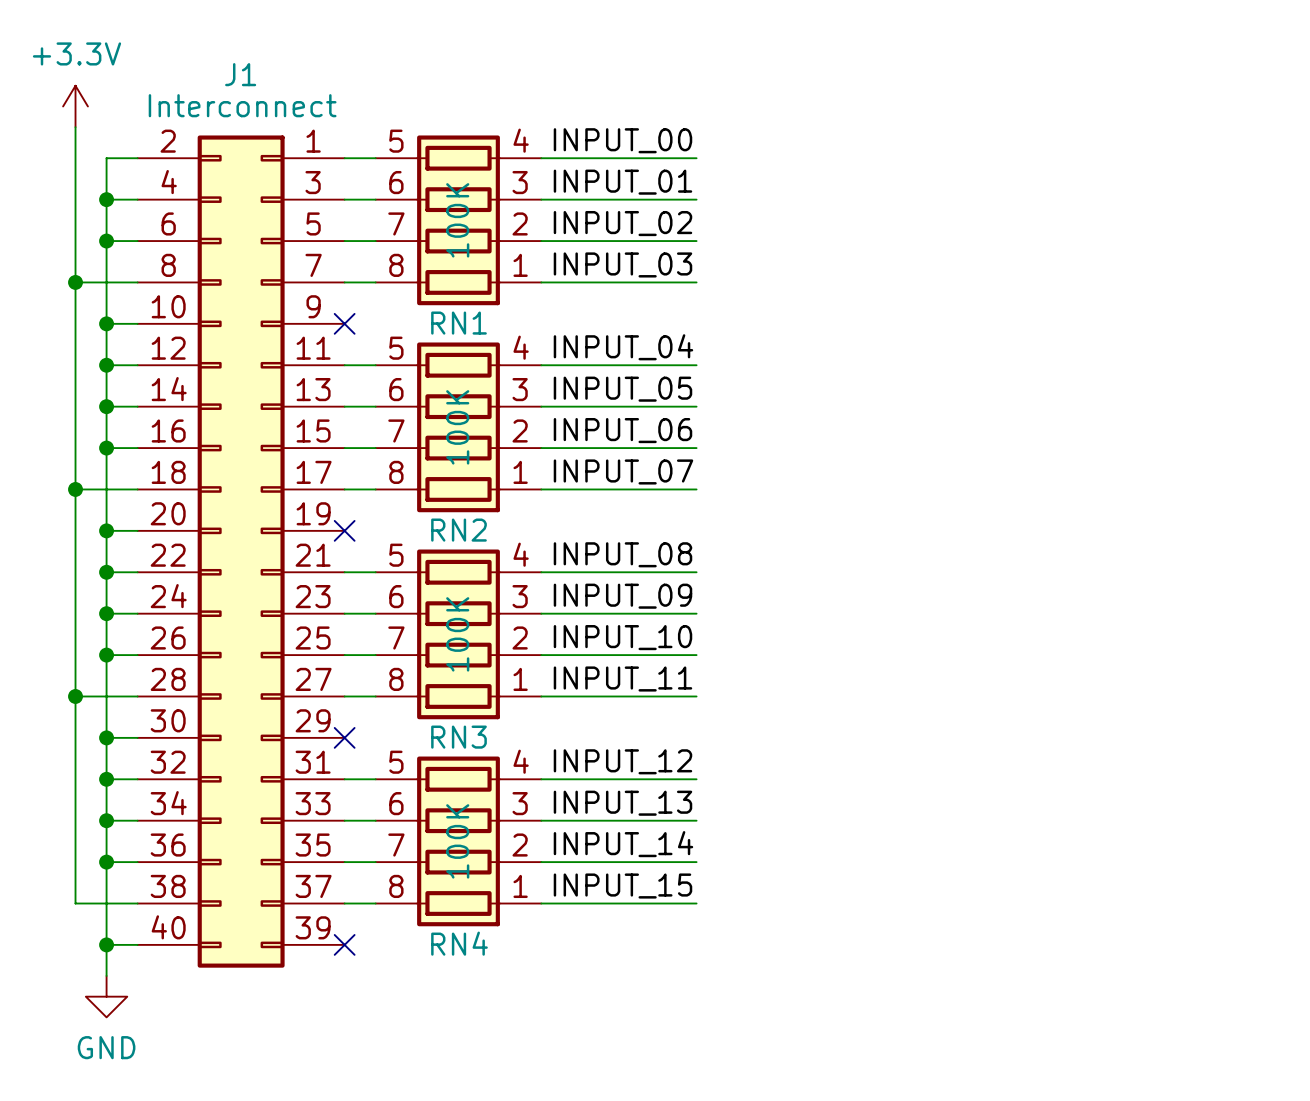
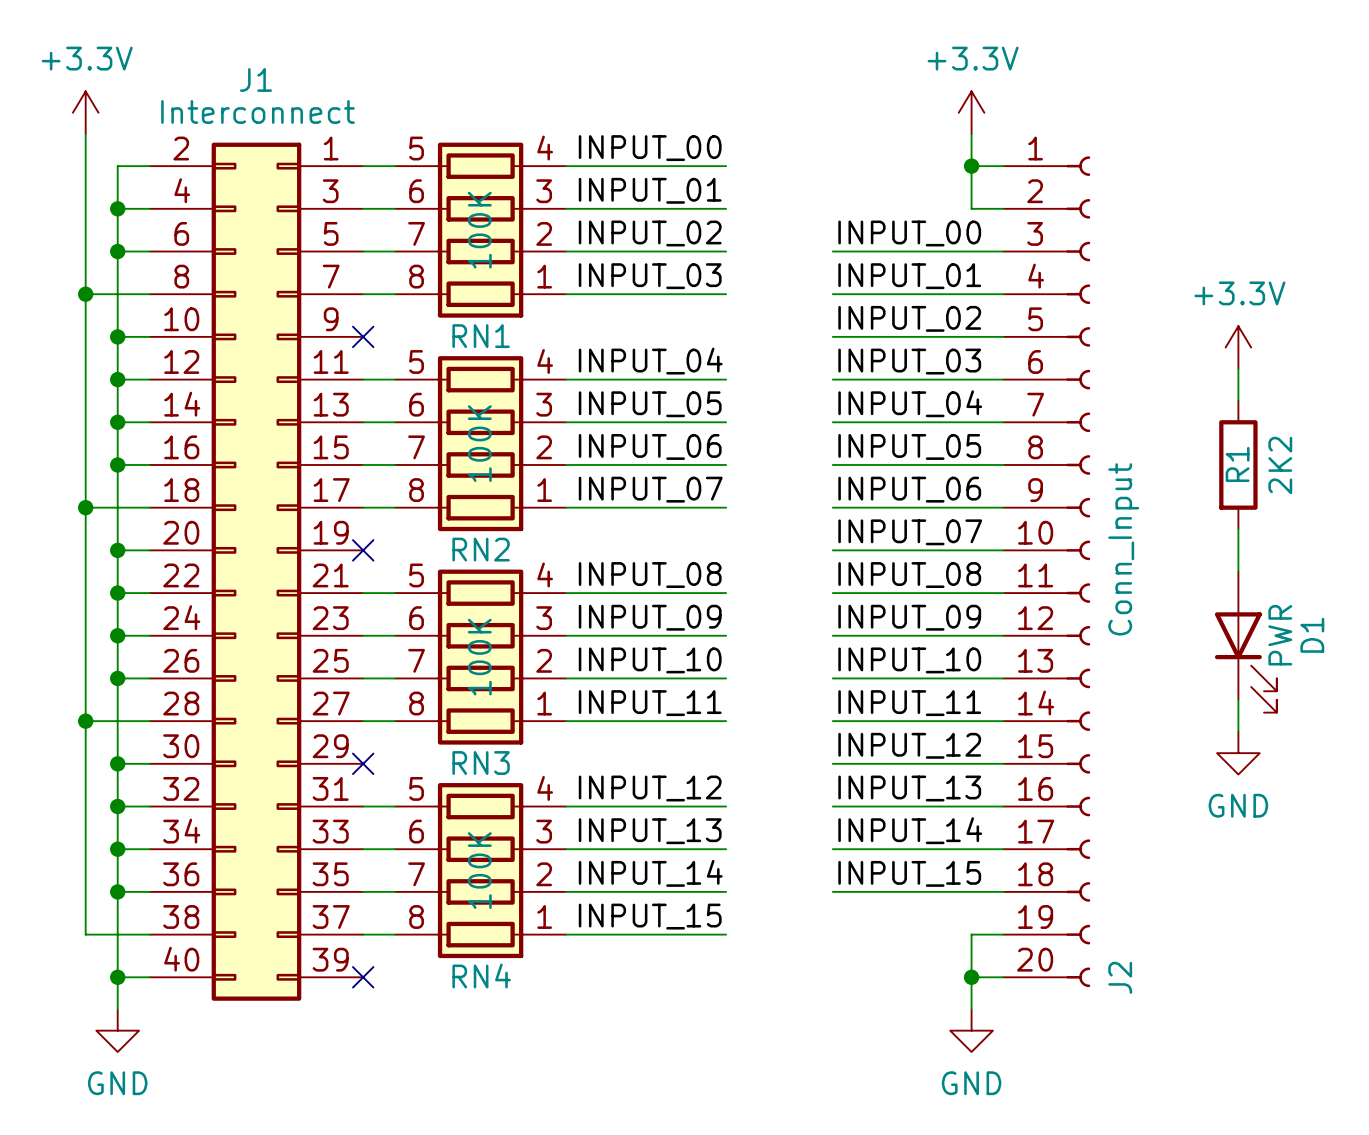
power symbol: none -> +3.3V (971, 112)
wire: none -> (971, 134) (971, 208) (1003, 208)
wire: none -> (971, 166) (1003, 166)
junction: none -> (971, 166)
label: none -> INPUT_00 (909, 233)
wire: none -> (832, 251) (1003, 251)
label: none -> INPUT_01 (909, 276)
wire: none -> (832, 294) (1003, 294)
label: none -> INPUT_02 (909, 318)
wire: none -> (832, 336) (1003, 336)
power symbol: none -> +3.3V (1238, 347)
label: none -> INPUT_03 (909, 361)
wire: none -> (1238, 368) (1238, 400)
wire: none -> (832, 379) (1003, 379)
label: none -> INPUT_04 (910, 403)
wire: none -> (832, 422) (1003, 422)
label: none -> INPUT_05 (909, 446)
wire: none -> (832, 464) (1003, 464)
R1: none -> 2K2 (1238, 464)
label: none -> INPUT_06 (909, 489)
wire: none -> (832, 507) (1003, 507)
wire: none -> (1238, 529) (1238, 571)
label: none -> INPUT_07 (910, 532)
wire: none -> (832, 550) (1003, 550)
J2: none -> Conn_Input (1046, 571)
label: none -> INPUT_08 (909, 575)
wire: none -> (832, 593) (1003, 593)
label: none -> INPUT_09 (909, 617)
wire: none -> (832, 635) (1003, 635)
D1: none -> PWR (1245, 642)
label: none -> INPUT_10 (909, 660)
wire: none -> (832, 678) (1003, 678)
wire: none -> (1238, 699) (1238, 731)
label: none -> INPUT_11 (909, 703)
wire: none -> (832, 721) (1003, 721)
label: none -> INPUT_12 (909, 745)
power symbol: none -> GND (1238, 753)
wire: none -> (832, 763) (1003, 763)
label: none -> INPUT_13 (909, 788)
wire: none -> (832, 806) (1003, 806)
label: none -> INPUT_14 (910, 830)
wire: none -> (832, 849) (1003, 849)
label: none -> INPUT_15 (909, 873)
wire: none -> (832, 891) (1003, 891)
wire: none -> (1003, 934) (971, 934) (971, 1009)
wire: none -> (971, 977) (1003, 977)
junction: none -> (971, 977)
power symbol: none -> GND (971, 1030)

